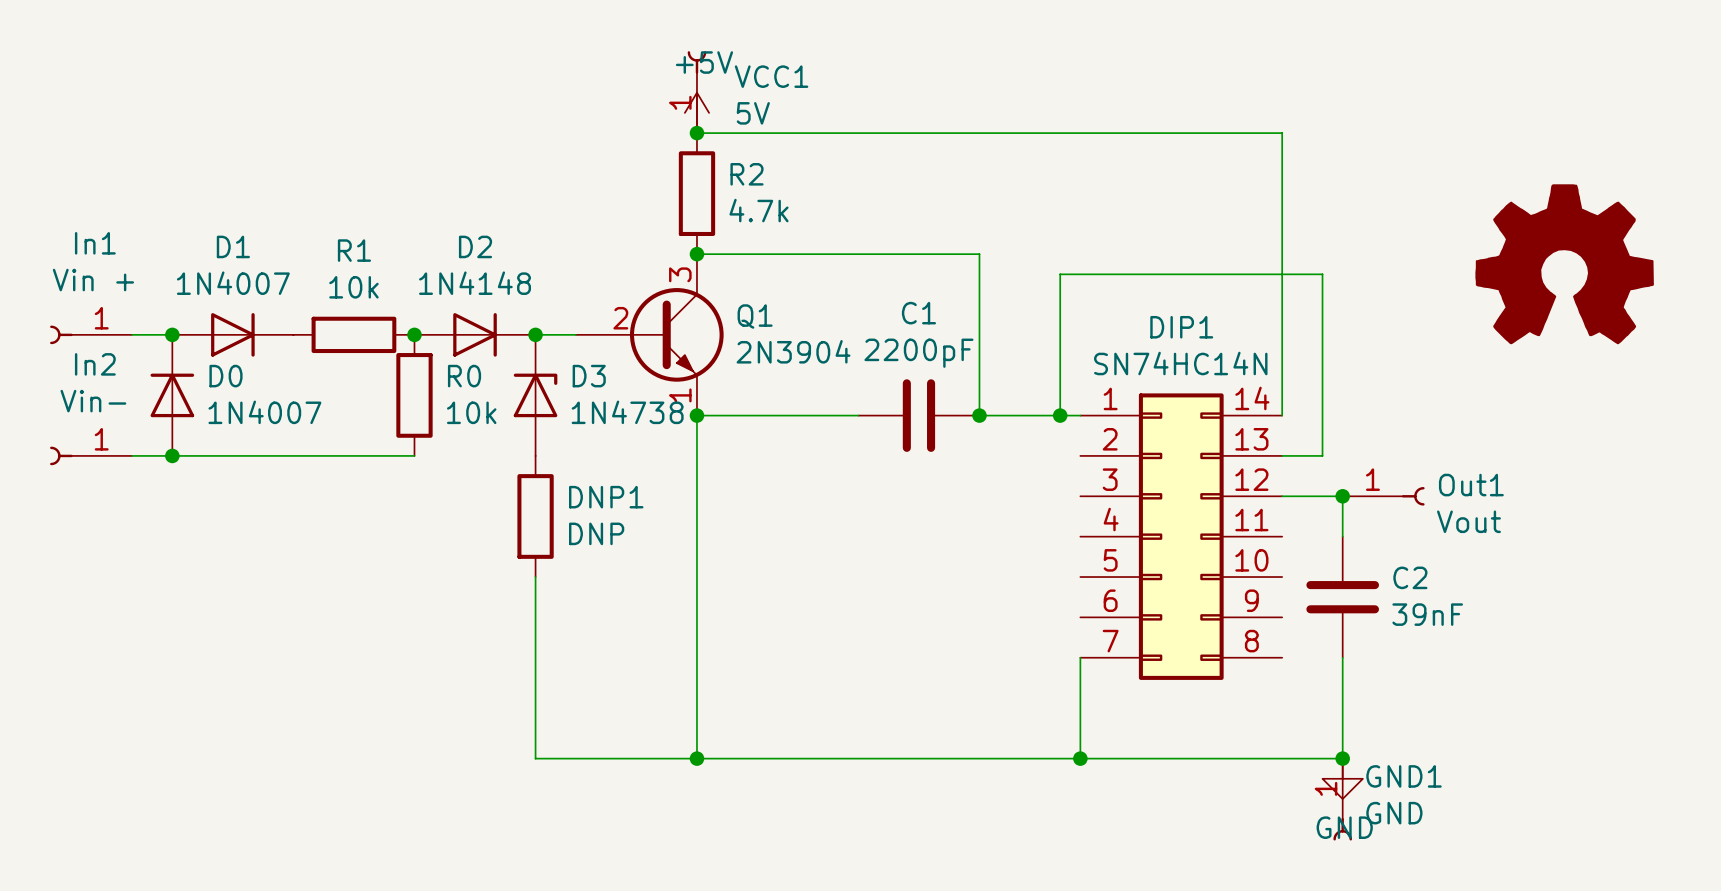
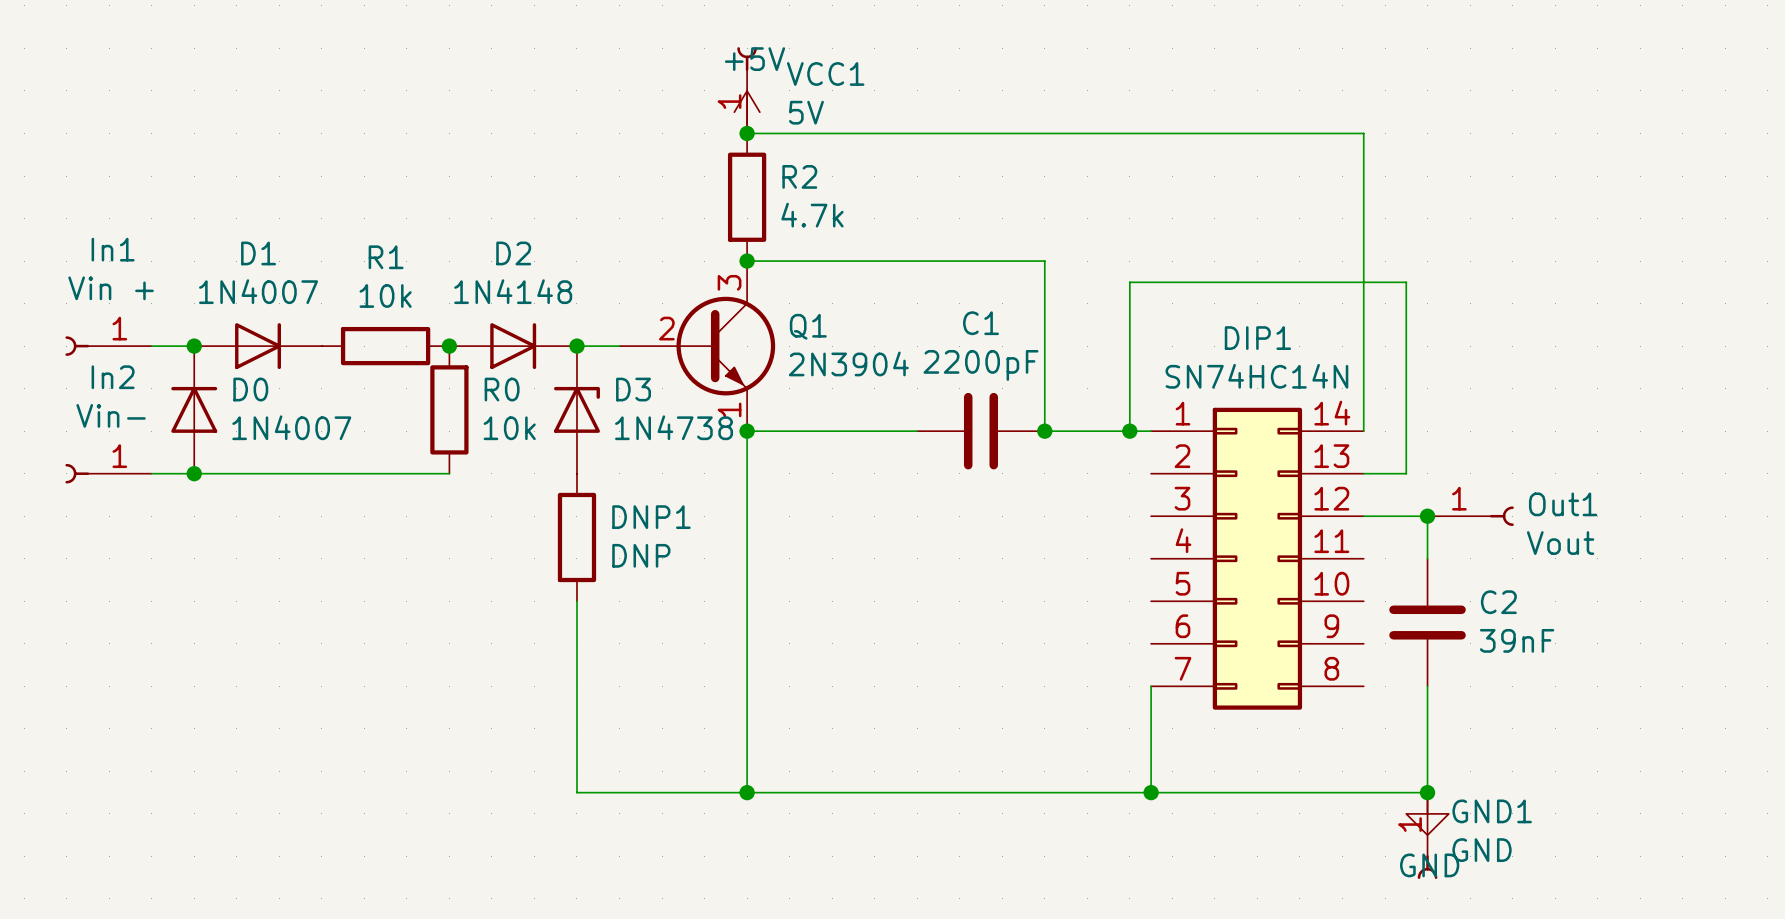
power symbol: (1564, 264) -> none

